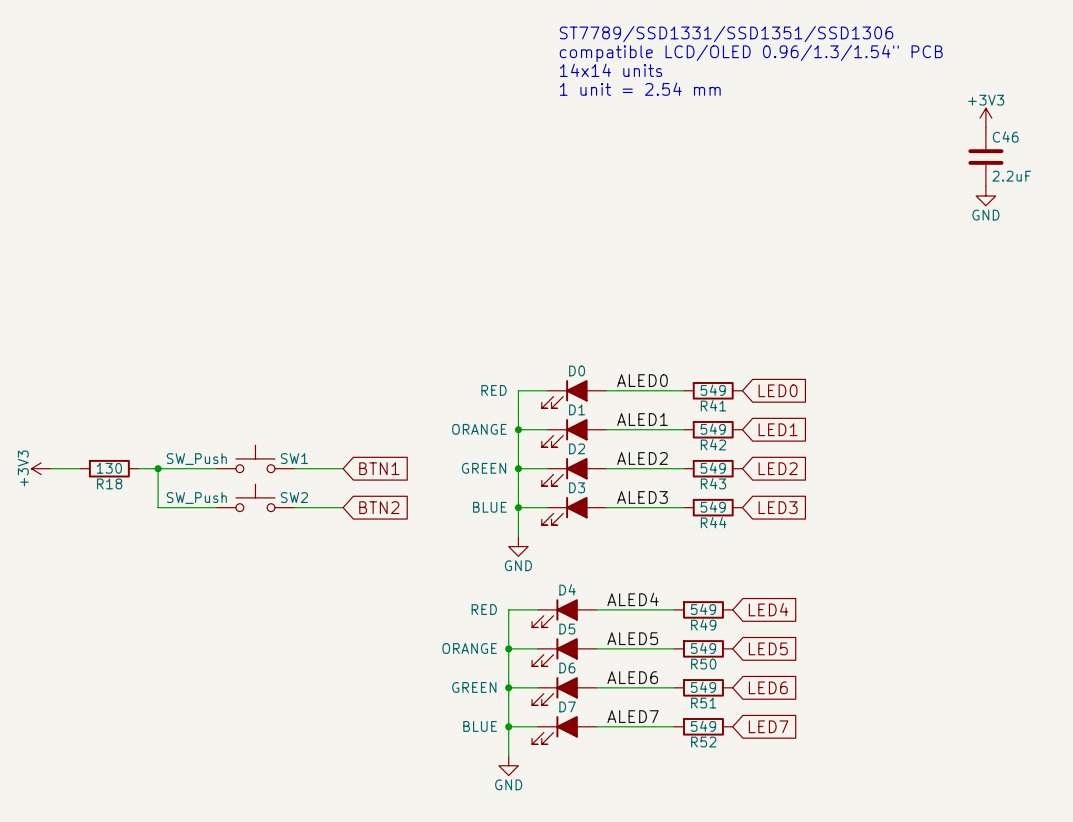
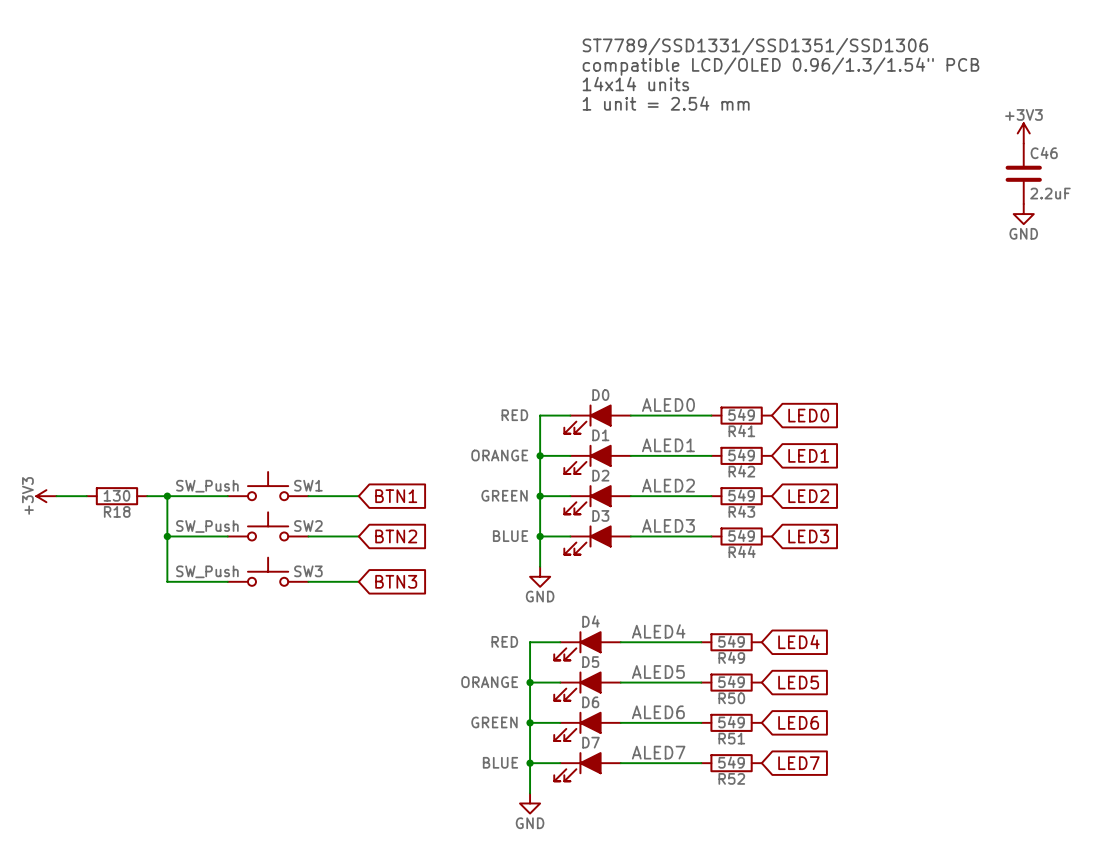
wire: none -> (167, 536) (167, 581) (227, 581)
junction: none -> (167, 536)
SW3: none -> SW_Push (268, 571)
wire: none -> (308, 581) (358, 581)
global label: none -> BTN3 (396, 581)

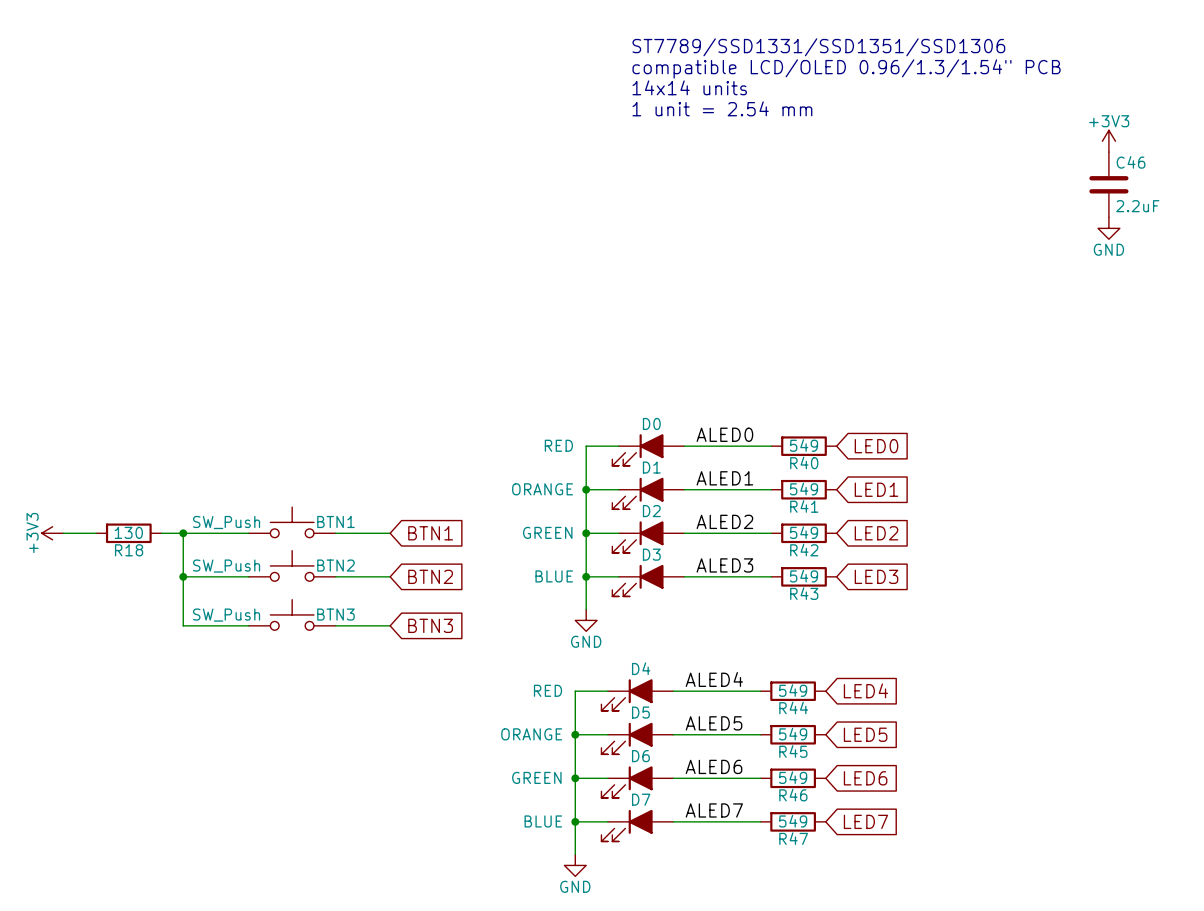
R41 name: R41 (741, 431) -> R40 (804, 462)
R42 name: R42 (741, 471) -> R41 (804, 506)
SW1 name: SW1 (308, 485) -> BTN1 (335, 521)
R43 name: R43 (741, 511) -> R42 (804, 550)
SW2 name: SW2 (308, 526) -> BTN2 (335, 565)
R44 name: R44 (742, 551) -> R43 (804, 593)
SW3 name: SW3 (308, 571) -> BTN3 (335, 614)
R49 name: R49 (731, 657) -> R44 (793, 707)
R50 name: R50 (731, 698) -> R45 (793, 751)
R51 name: R51 (731, 738) -> R46 (793, 795)
R52 name: R52 (731, 778) -> R47 (793, 838)

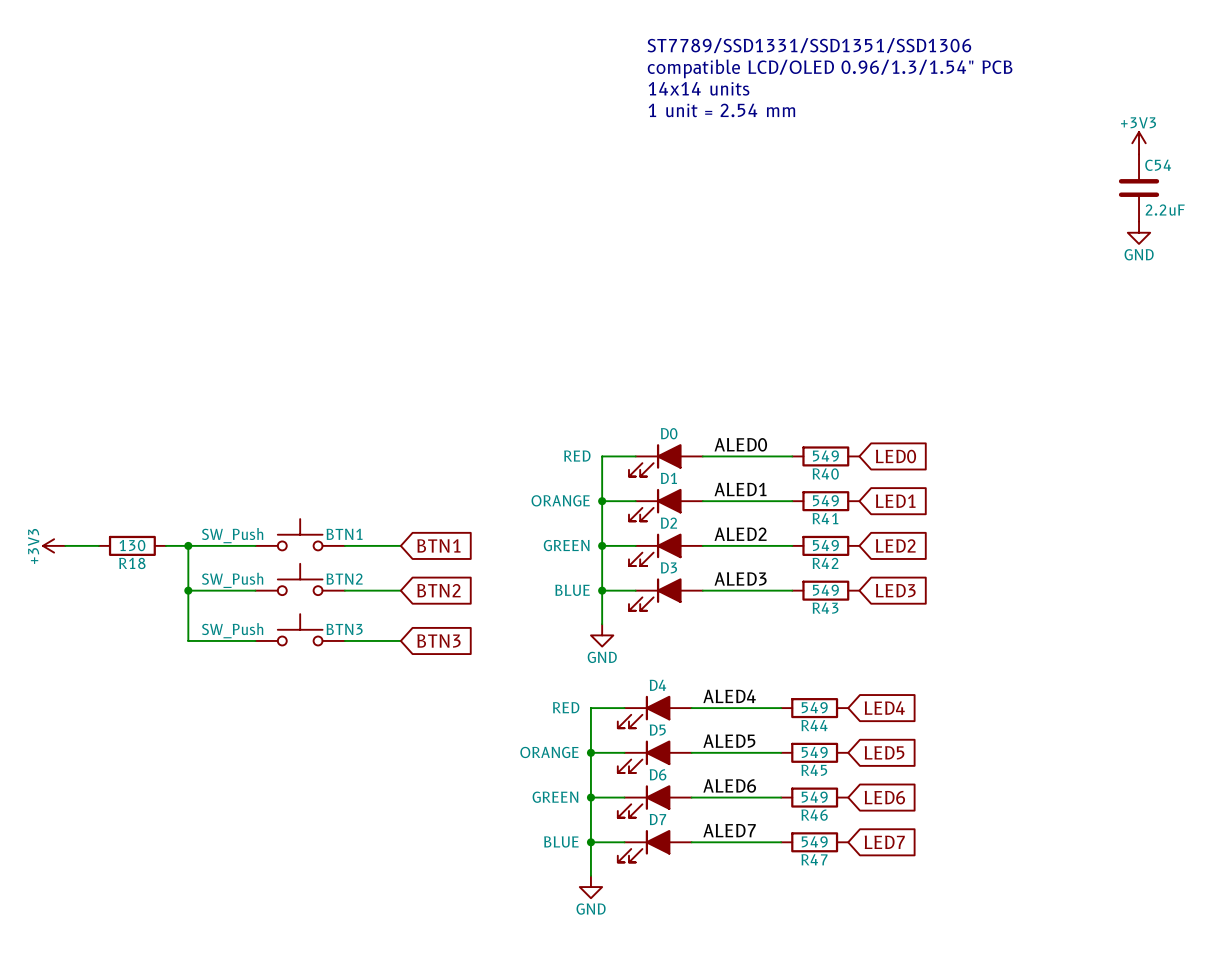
C46 name: C46 (1131, 162) -> C54 (1158, 165)

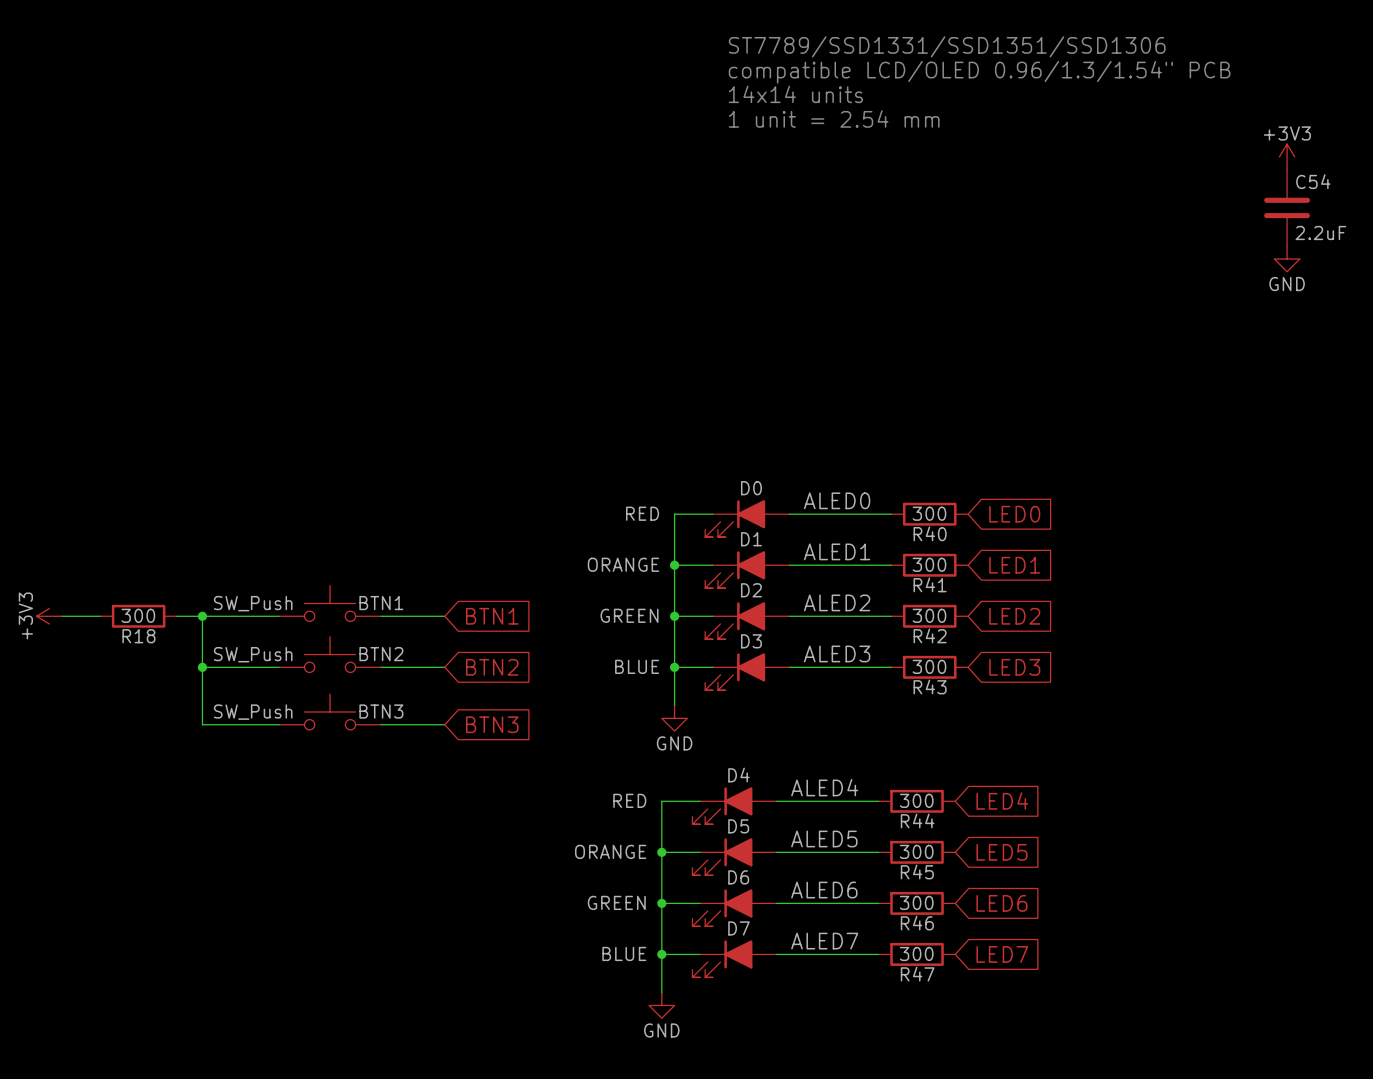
R40 value: 549 (825, 456) -> 300 (929, 513)
R41 value: 549 (825, 500) -> 300 (929, 564)
R18 value: 130 (132, 545) -> 300 (138, 615)
R42 value: 549 (825, 545) -> 300 (929, 615)
R43 value: 549 (825, 590) -> 300 (929, 666)
R44 value: 549 (814, 707) -> 300 (916, 800)
R45 value: 549 (814, 752) -> 300 (916, 851)
R46 value: 549 (814, 797) -> 300 (916, 902)
R47 value: 549 (814, 841) -> 300 (916, 953)

